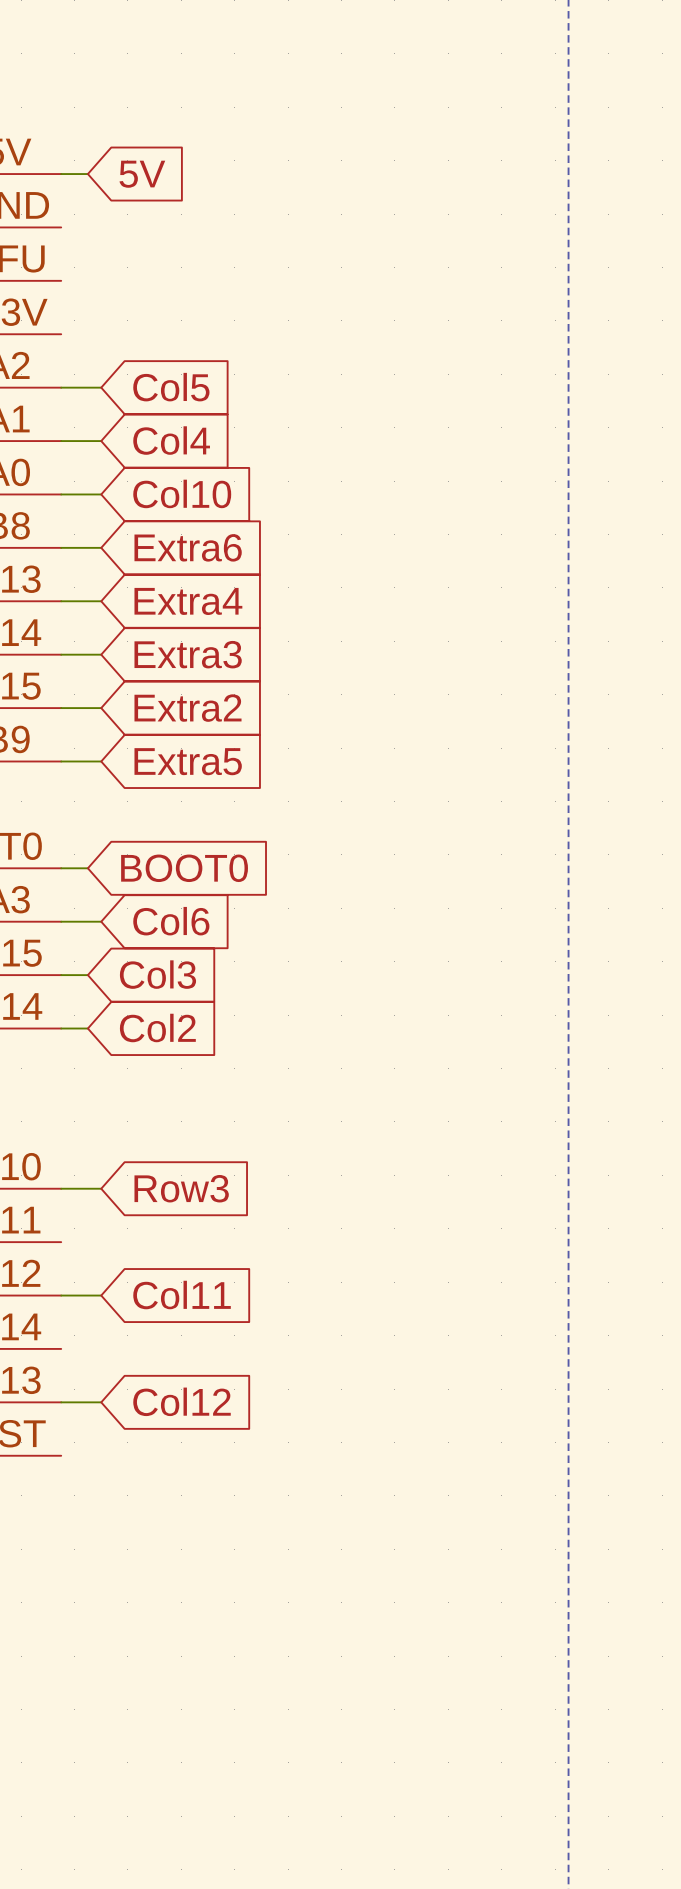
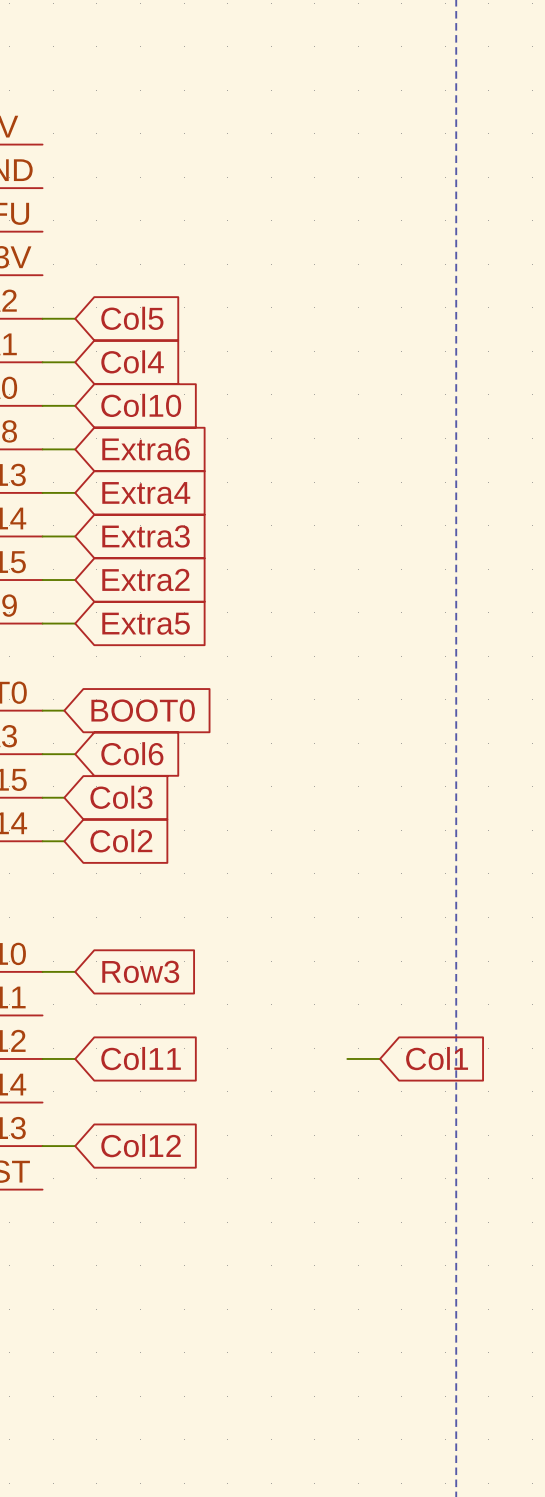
wire: (61, 174) (87, 174) -> none
global label: 5V (142, 174) -> none
wire: none -> (347, 1058) (380, 1058)
global label: none -> Col1 (437, 1058)

